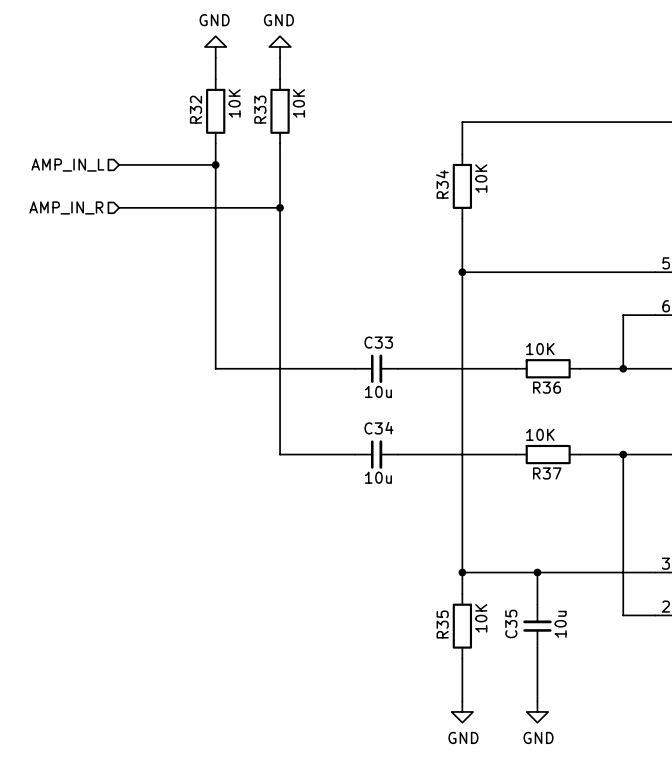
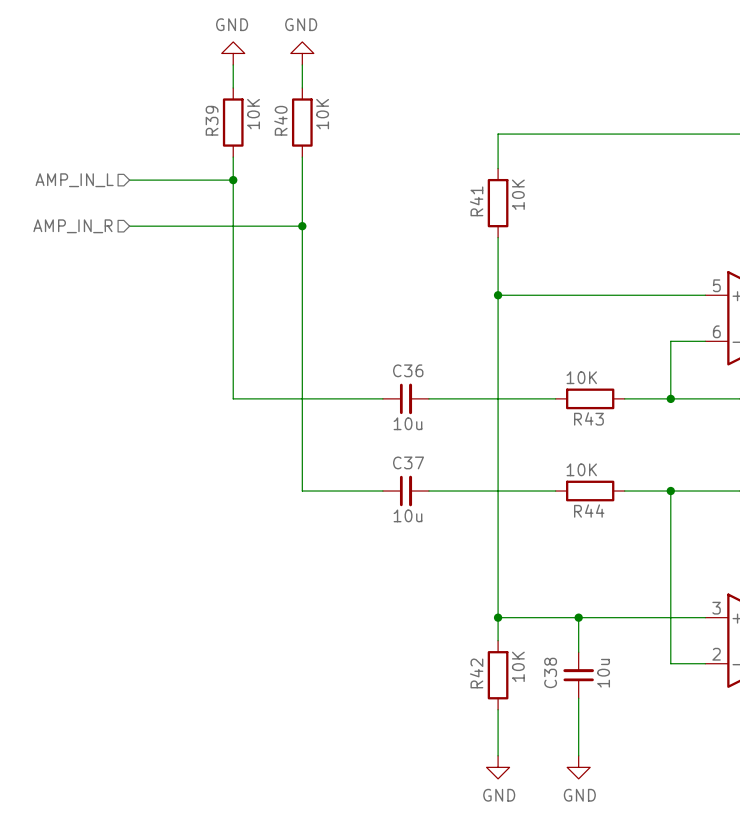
R32 name: R32 (195, 109) -> R39 (212, 120)
R33 name: R33 (260, 109) -> R40 (280, 120)
R34 name: R34 (442, 184) -> R41 (476, 201)
C33 name: C33 (378, 342) -> C36 (408, 370)
R36 name: R36 (547, 387) -> R43 (588, 418)
C34 name: C34 (378, 428) -> C37 (408, 462)
R37 name: R37 (547, 473) -> R44 (589, 511)
R35 name: R35 (442, 624) -> R42 (476, 673)
C35 name: C35 (511, 624) -> C38 (550, 672)

